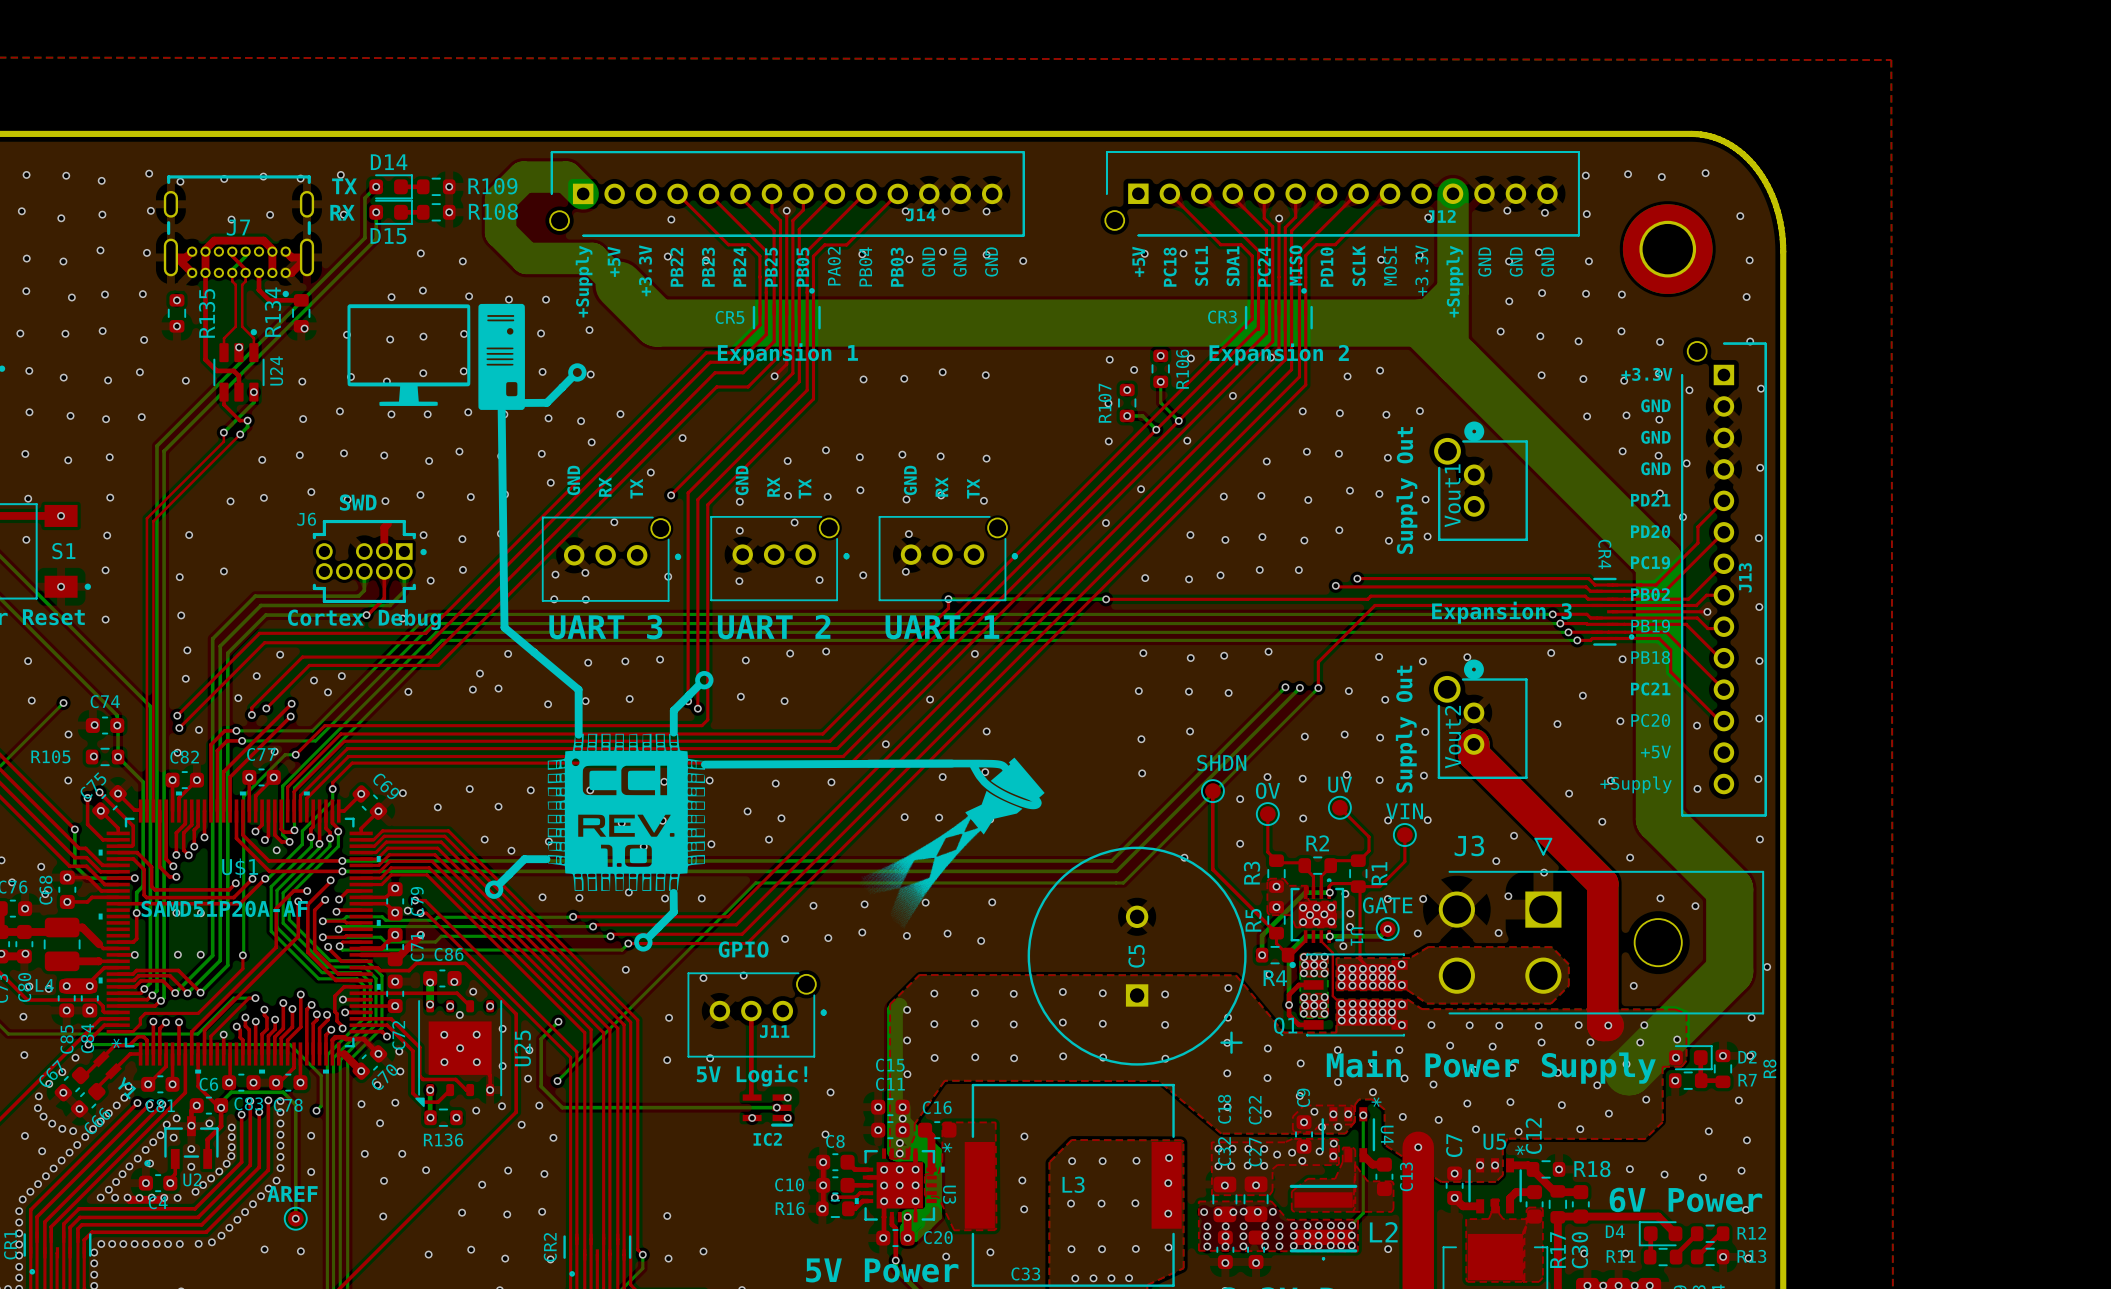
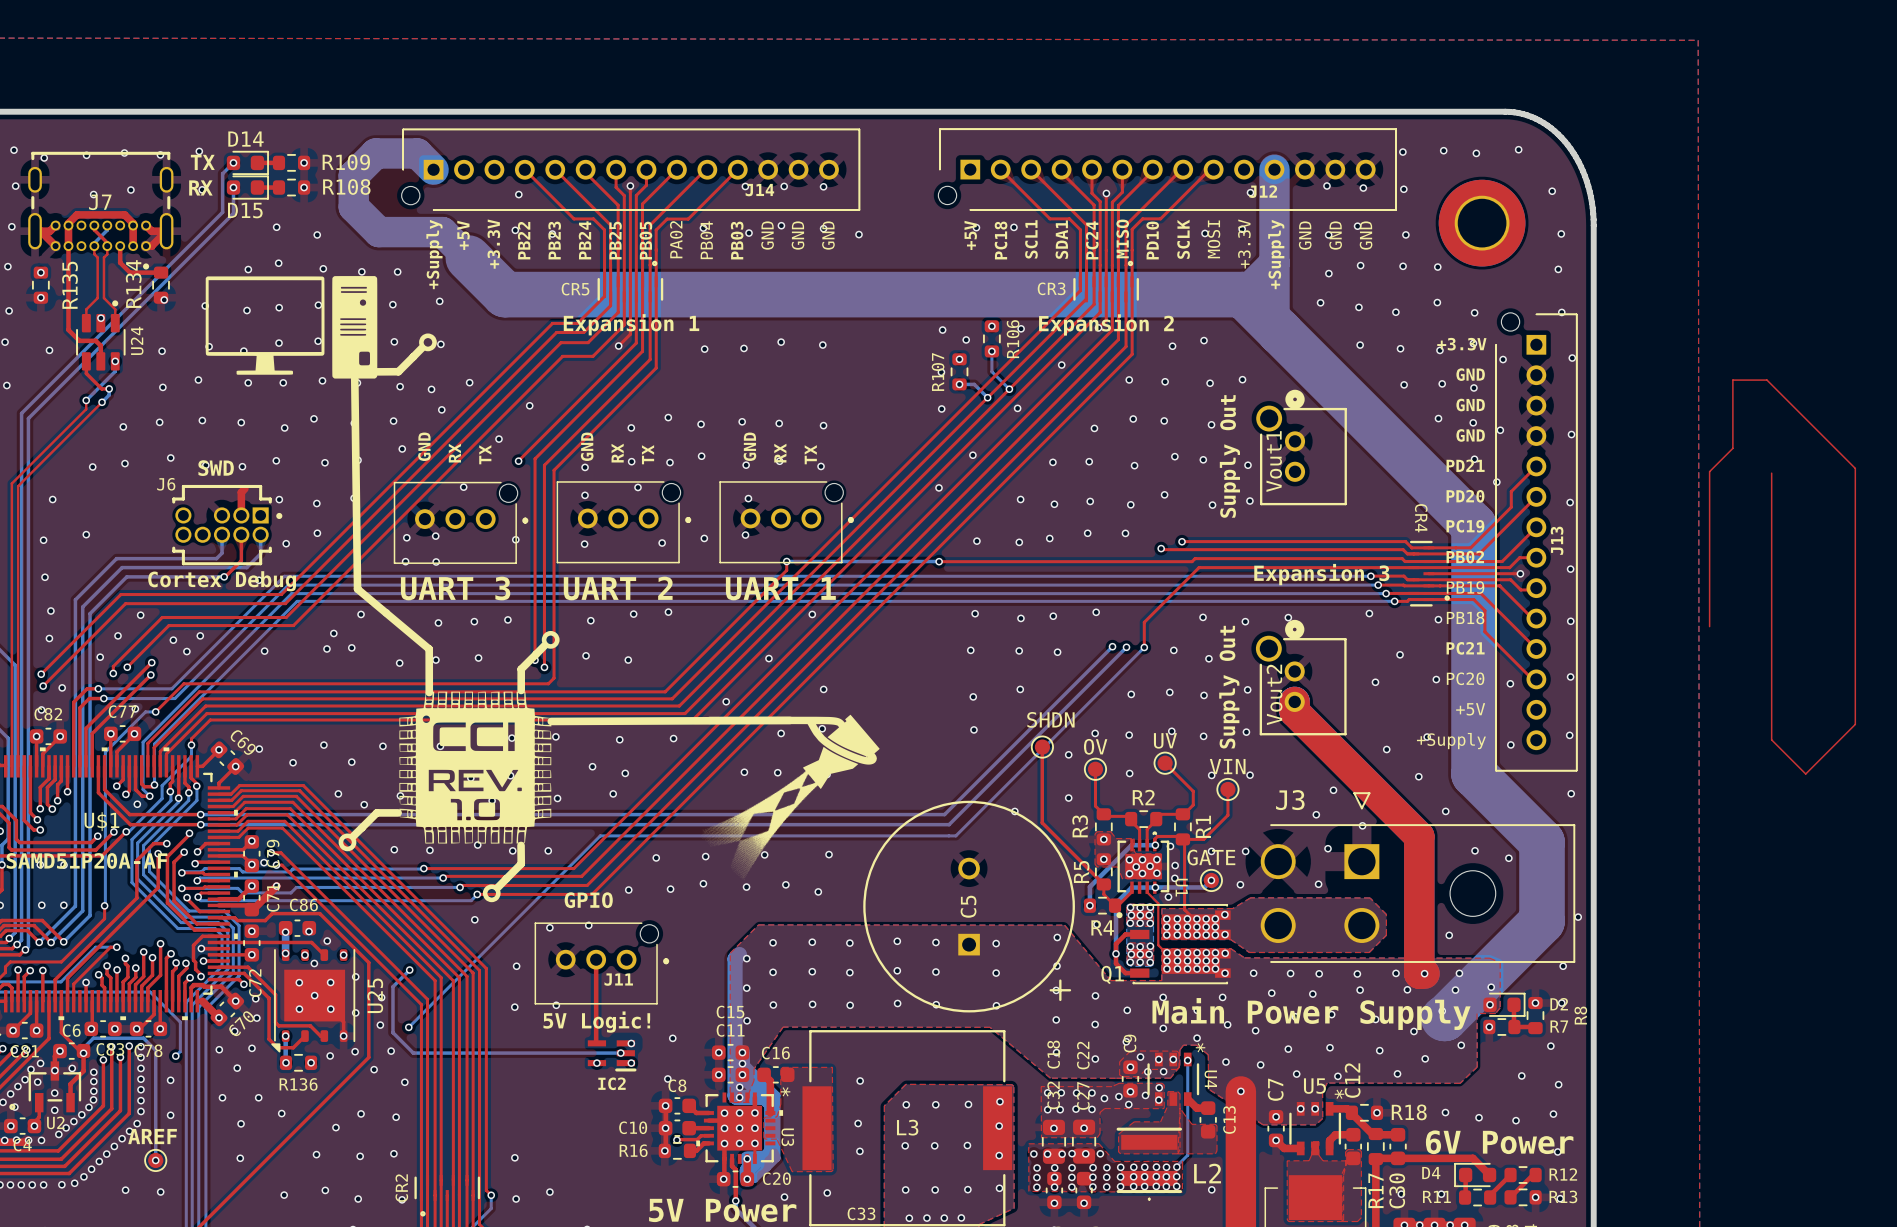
top track: none -> (1771, 473) (1771, 739) (1805, 773) (1855, 724) (1855, 468) (1766, 380) (1732, 380) (1732, 448) (1709, 471) (1709, 626)

